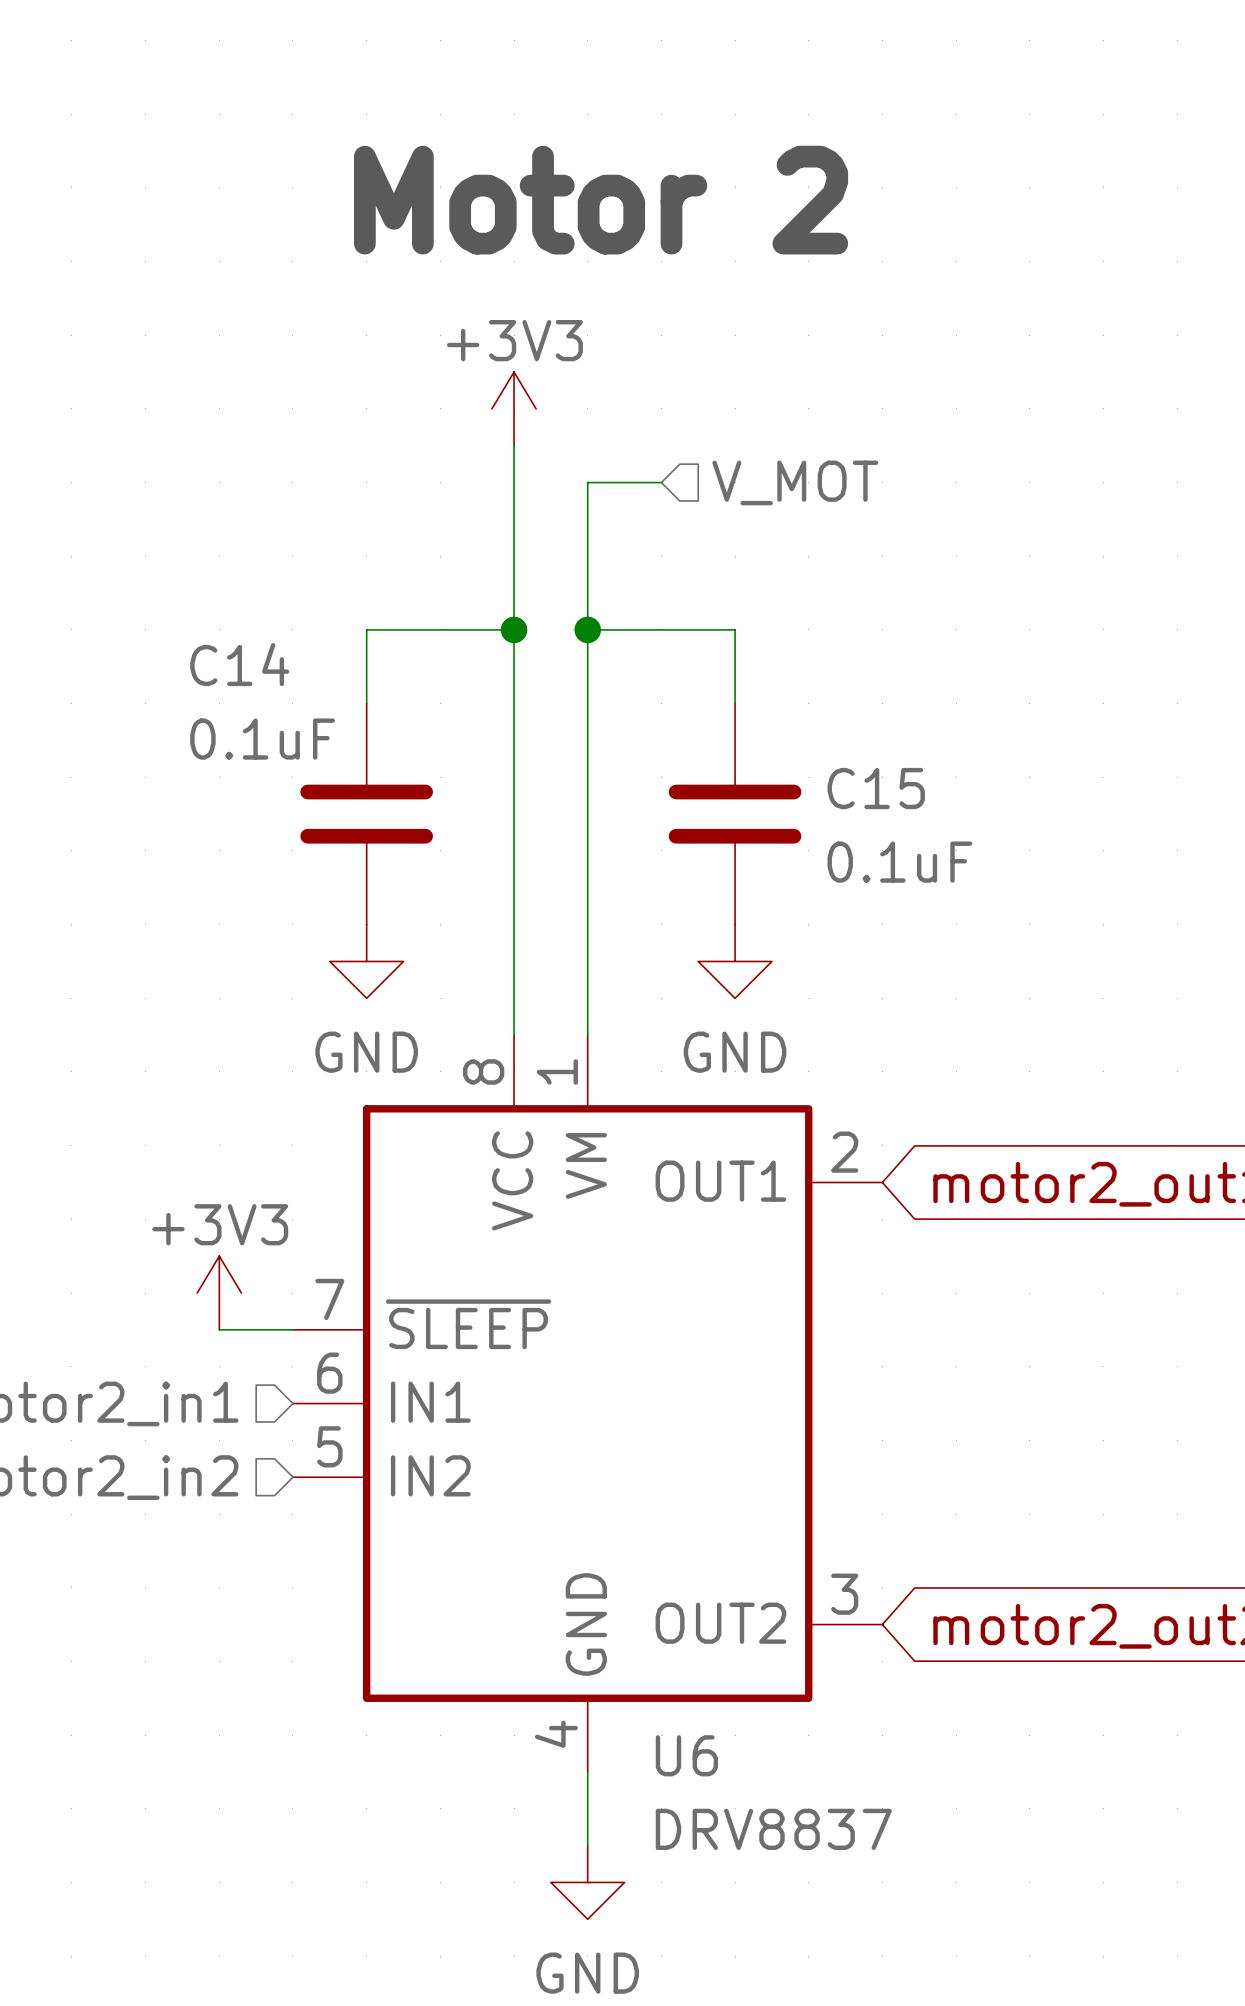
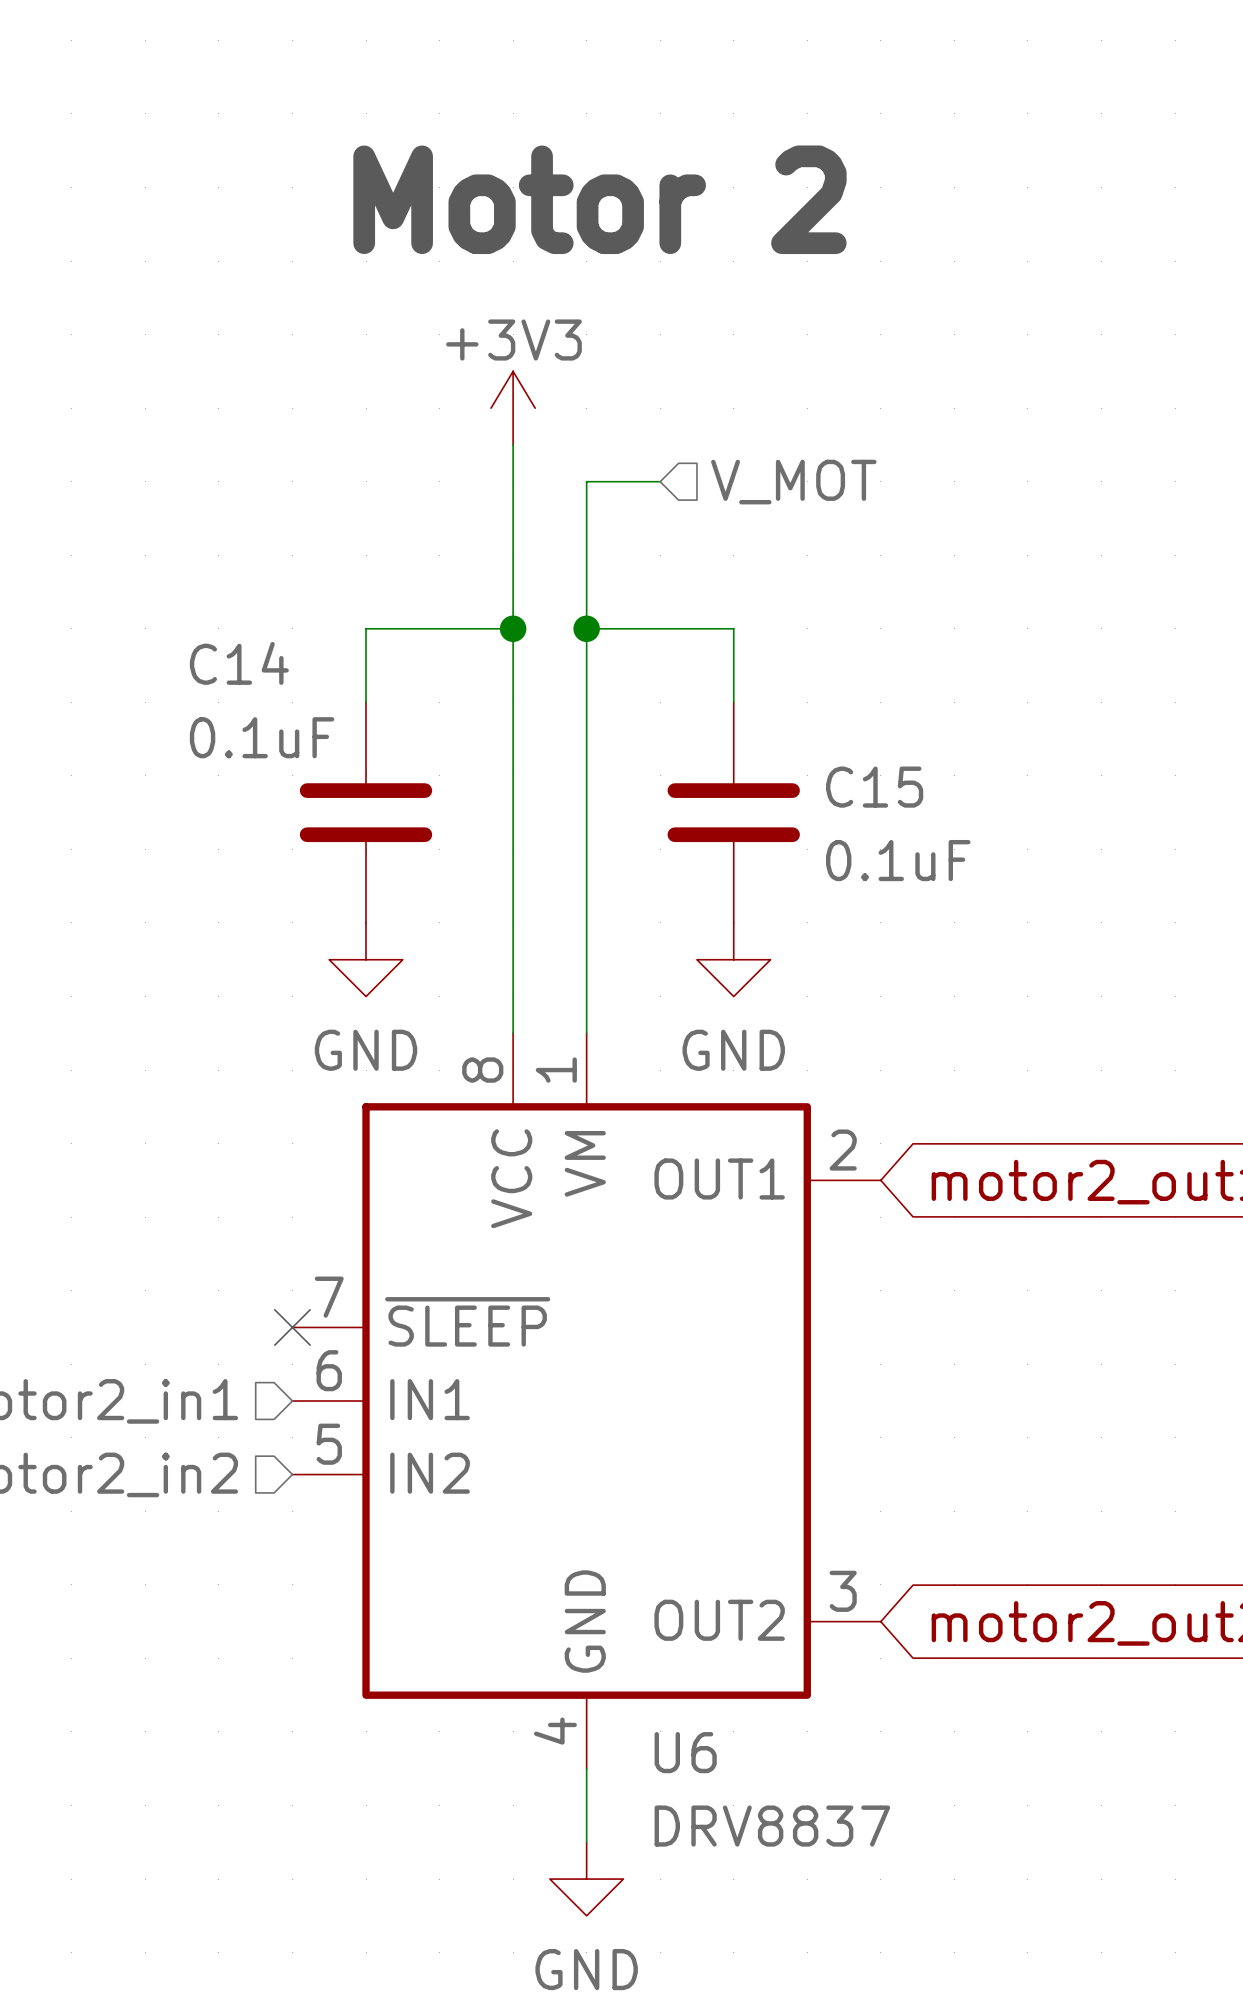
power symbol: +3V3 (219, 1293) -> none
wire: (219, 1329) (292, 1329) -> none
no-connect mark: none -> (292, 1327)

